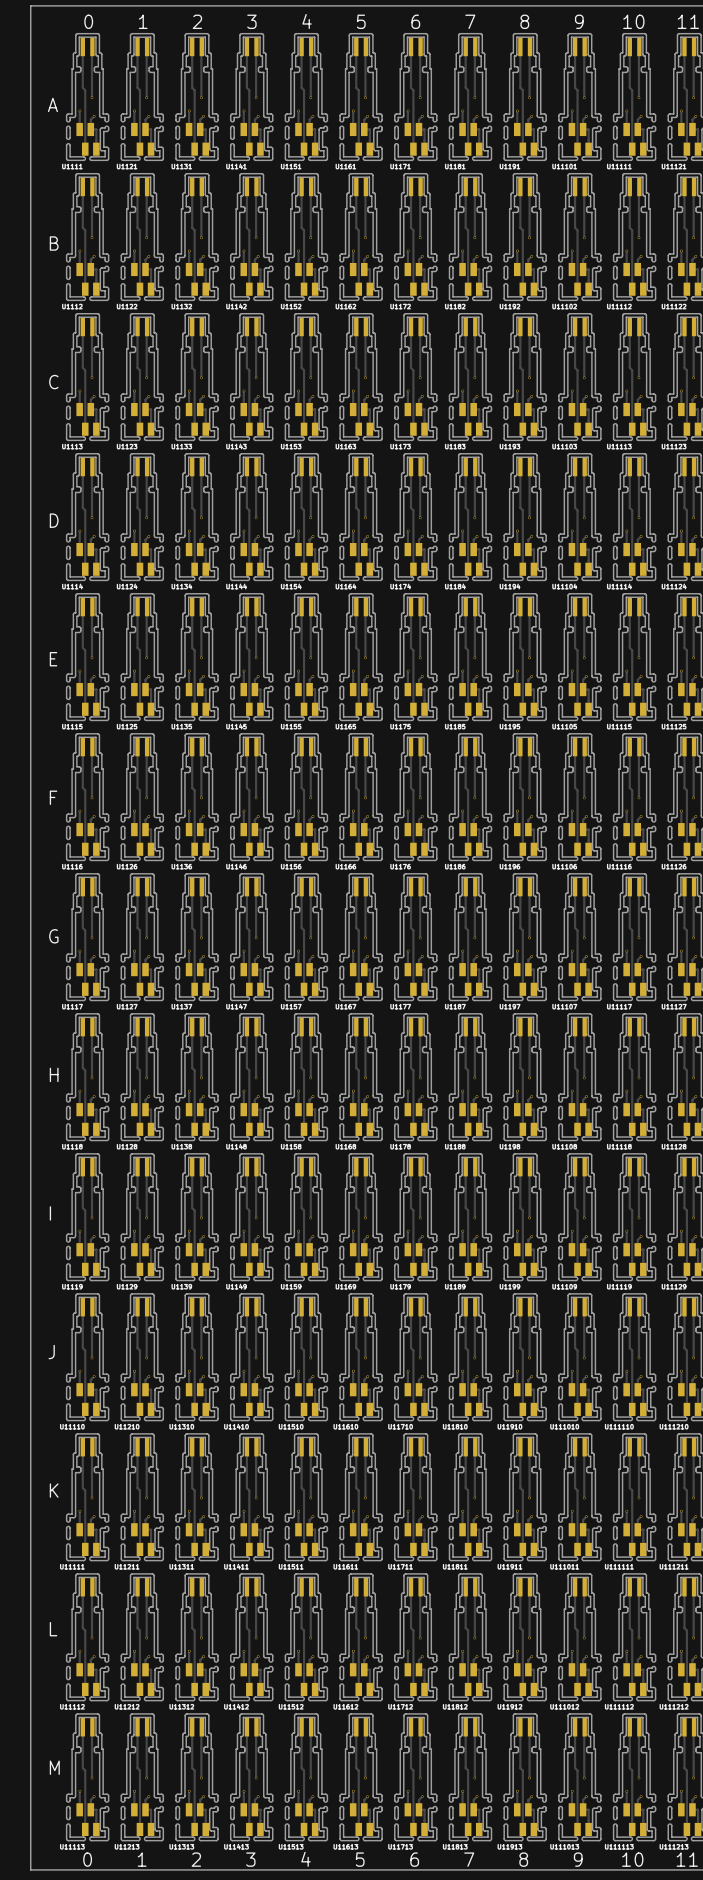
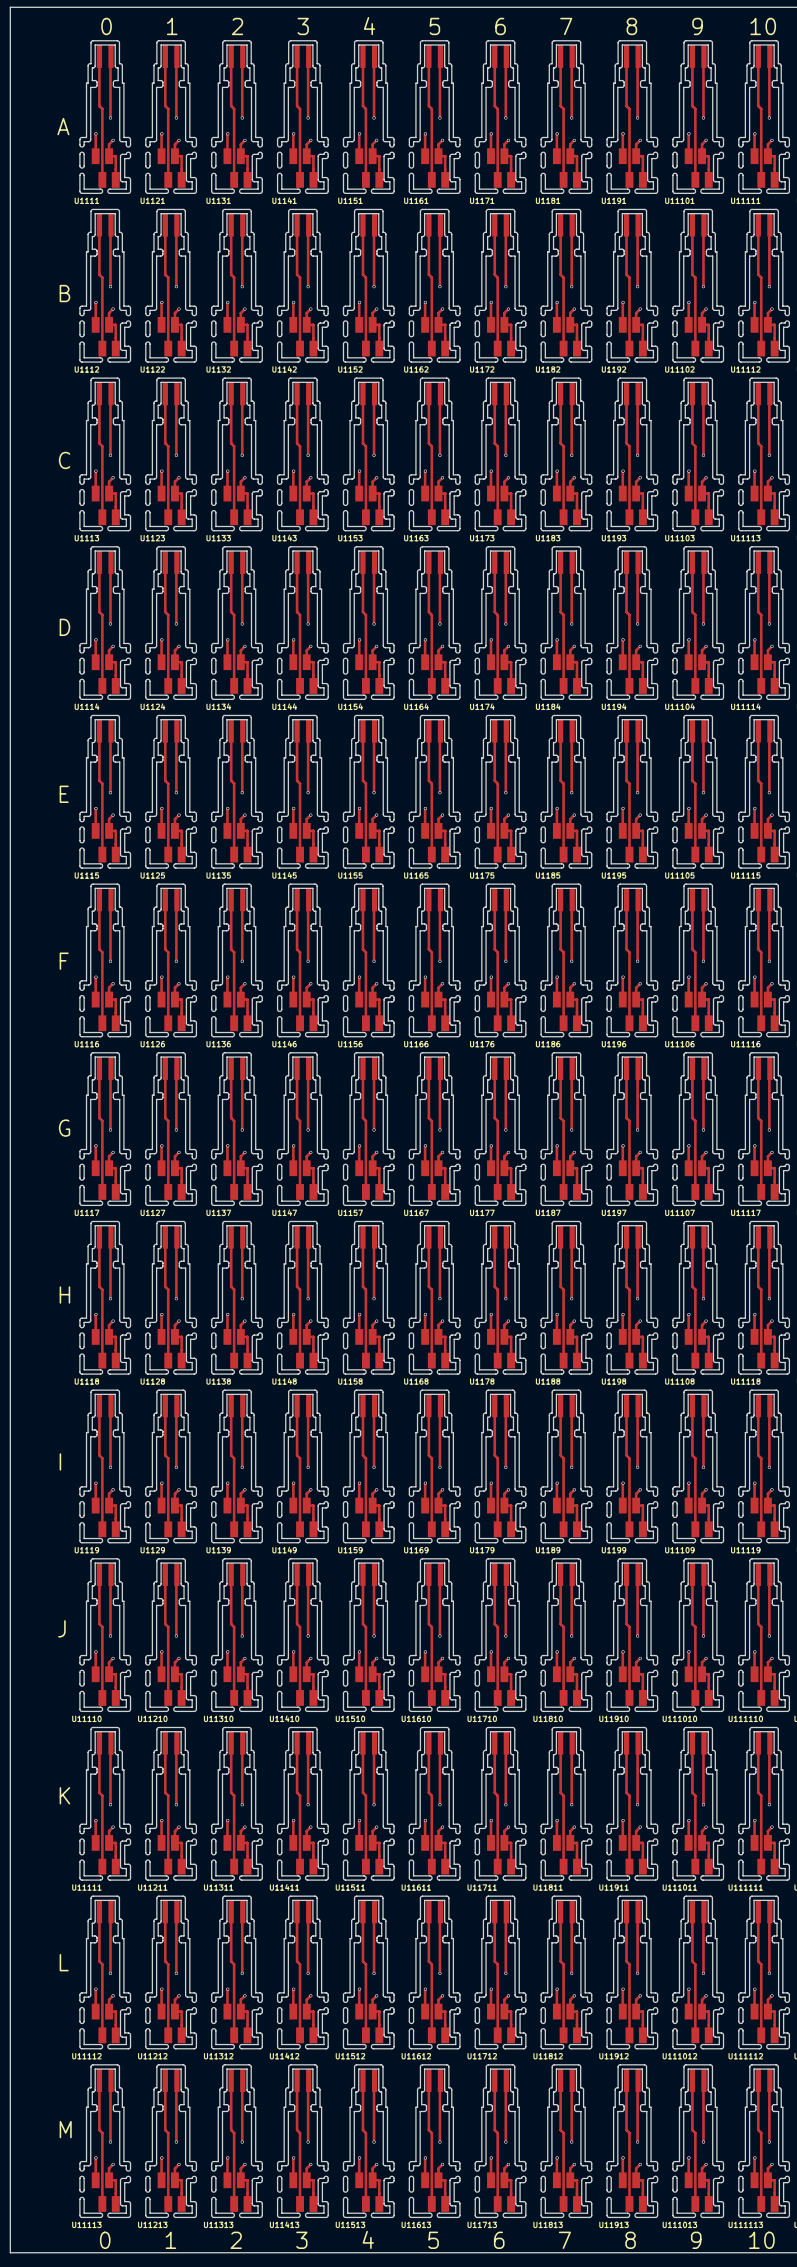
board edge: (30, 5) (30, 1869) -> (36, 7) (10, 7) (10, 2252) (36, 2252)

